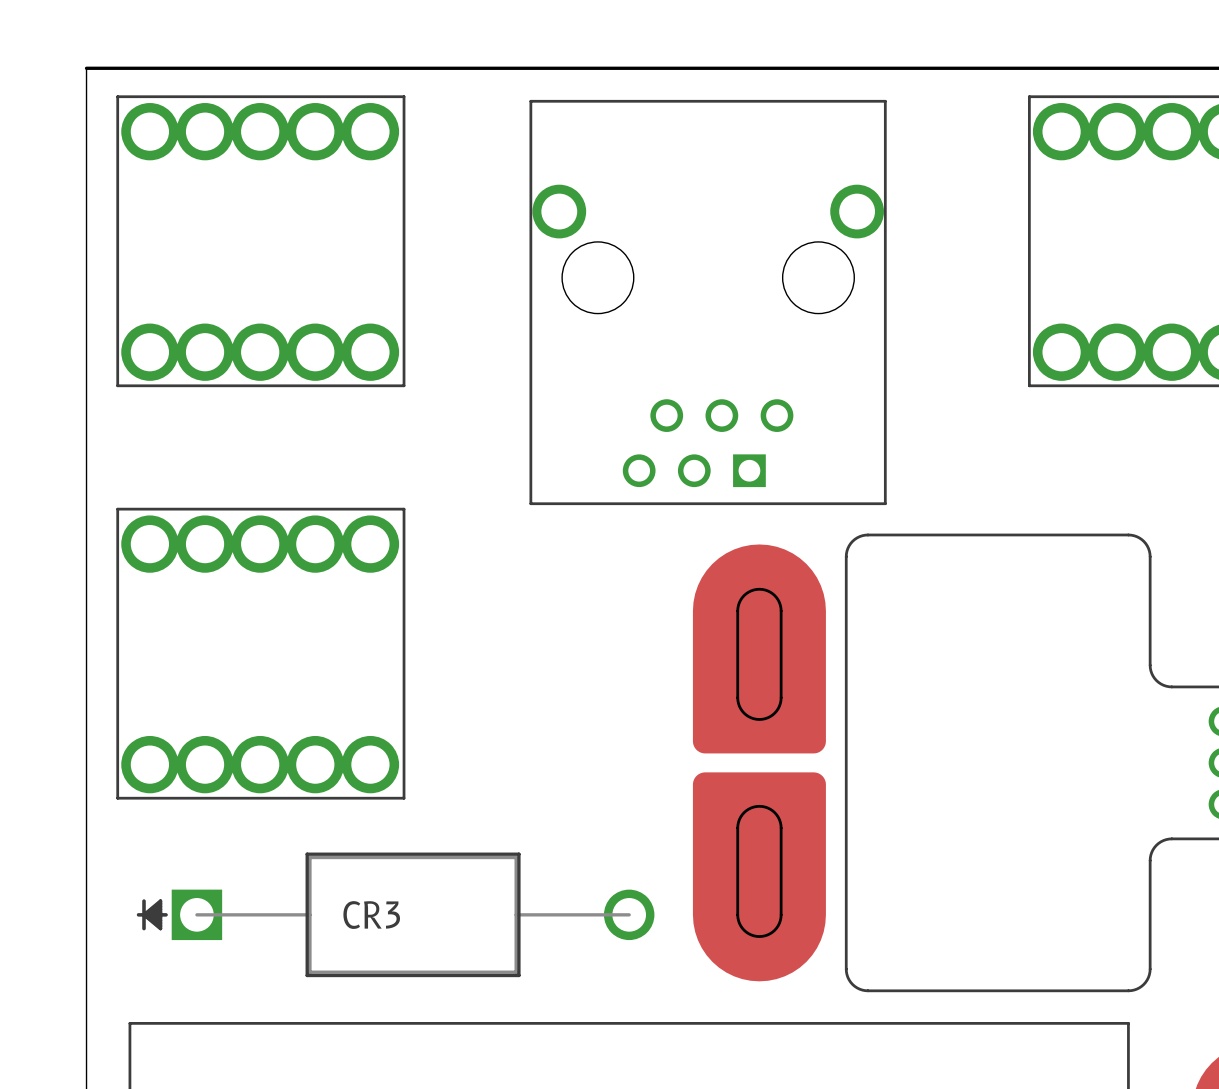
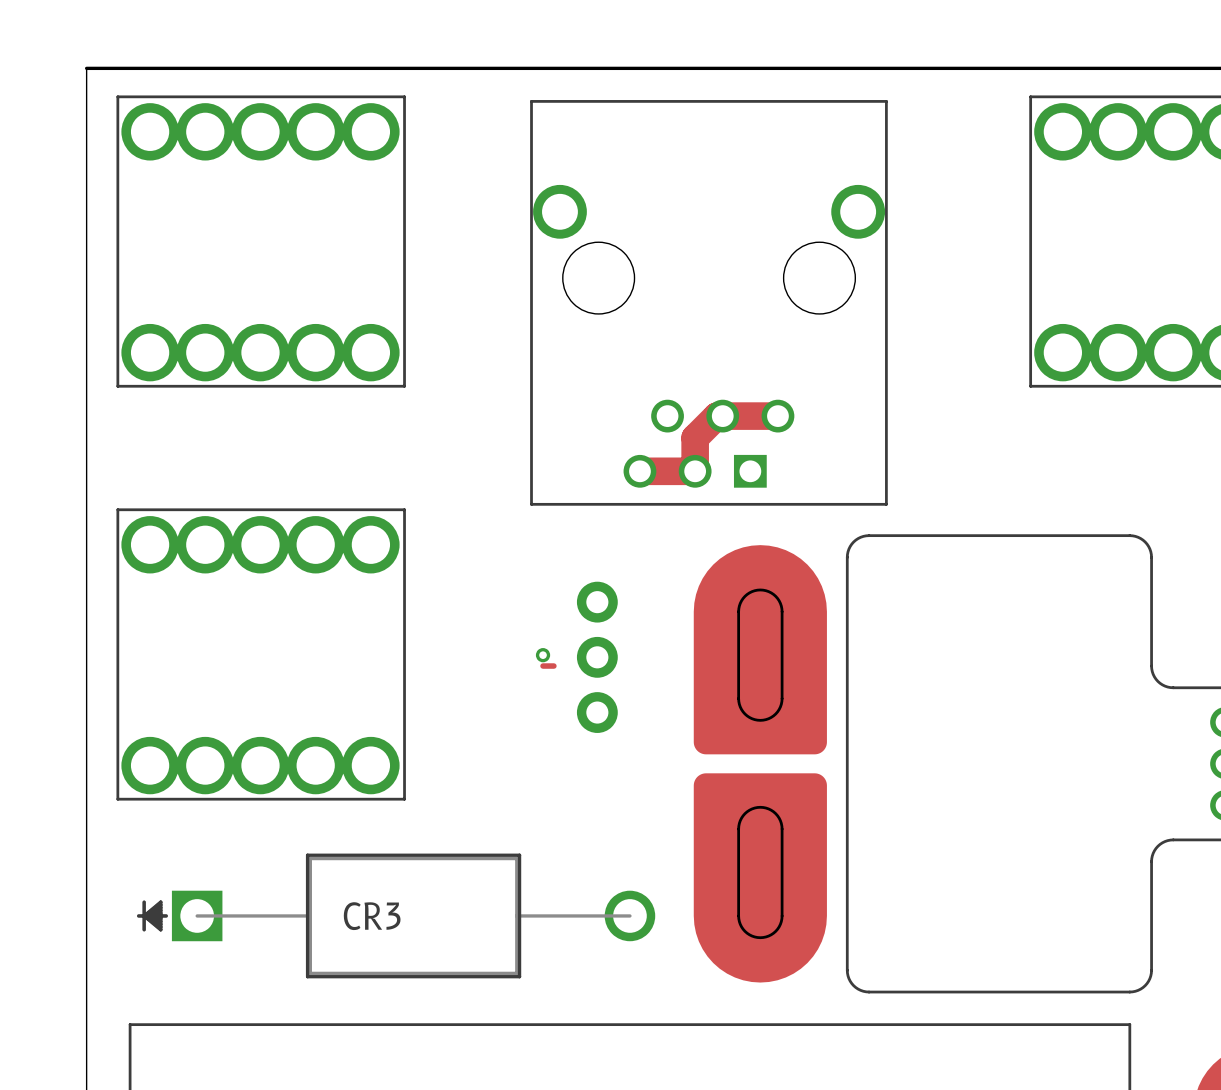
track: none -> (777, 416) (716, 416) (695, 437) (695, 471) (639, 471)
via: none -> (543, 655)
part: none -> (597, 657)
track: none -> (543, 666) (553, 666)

